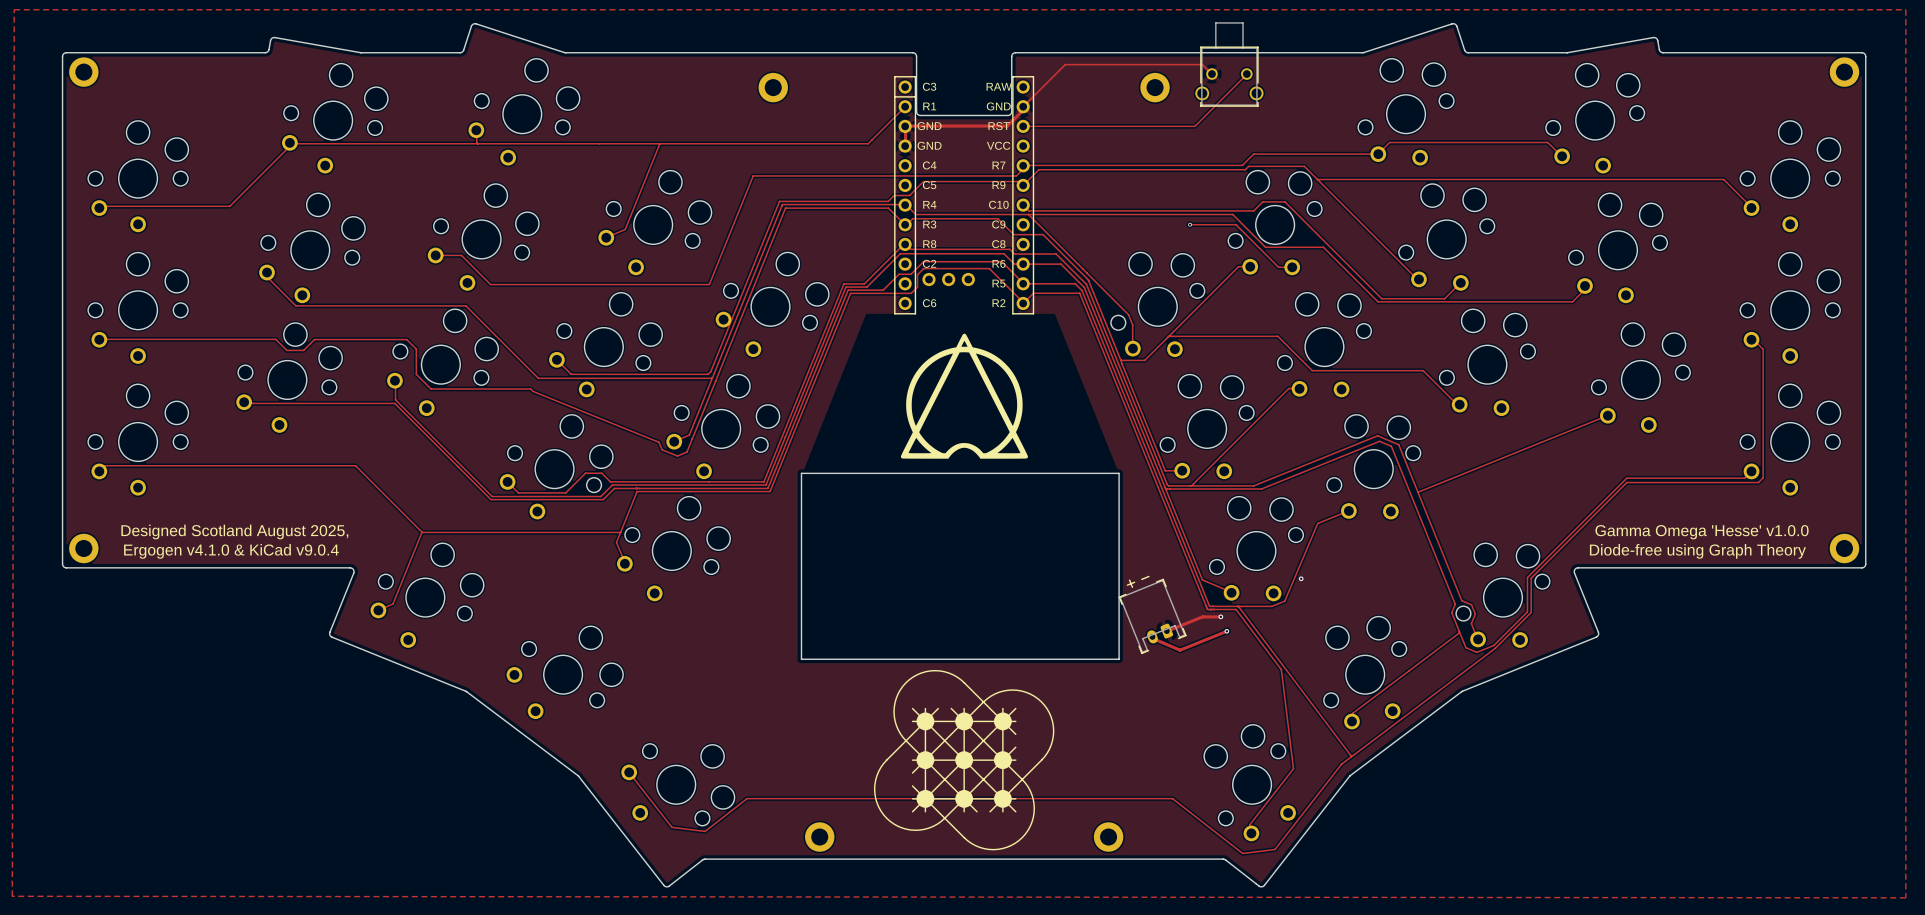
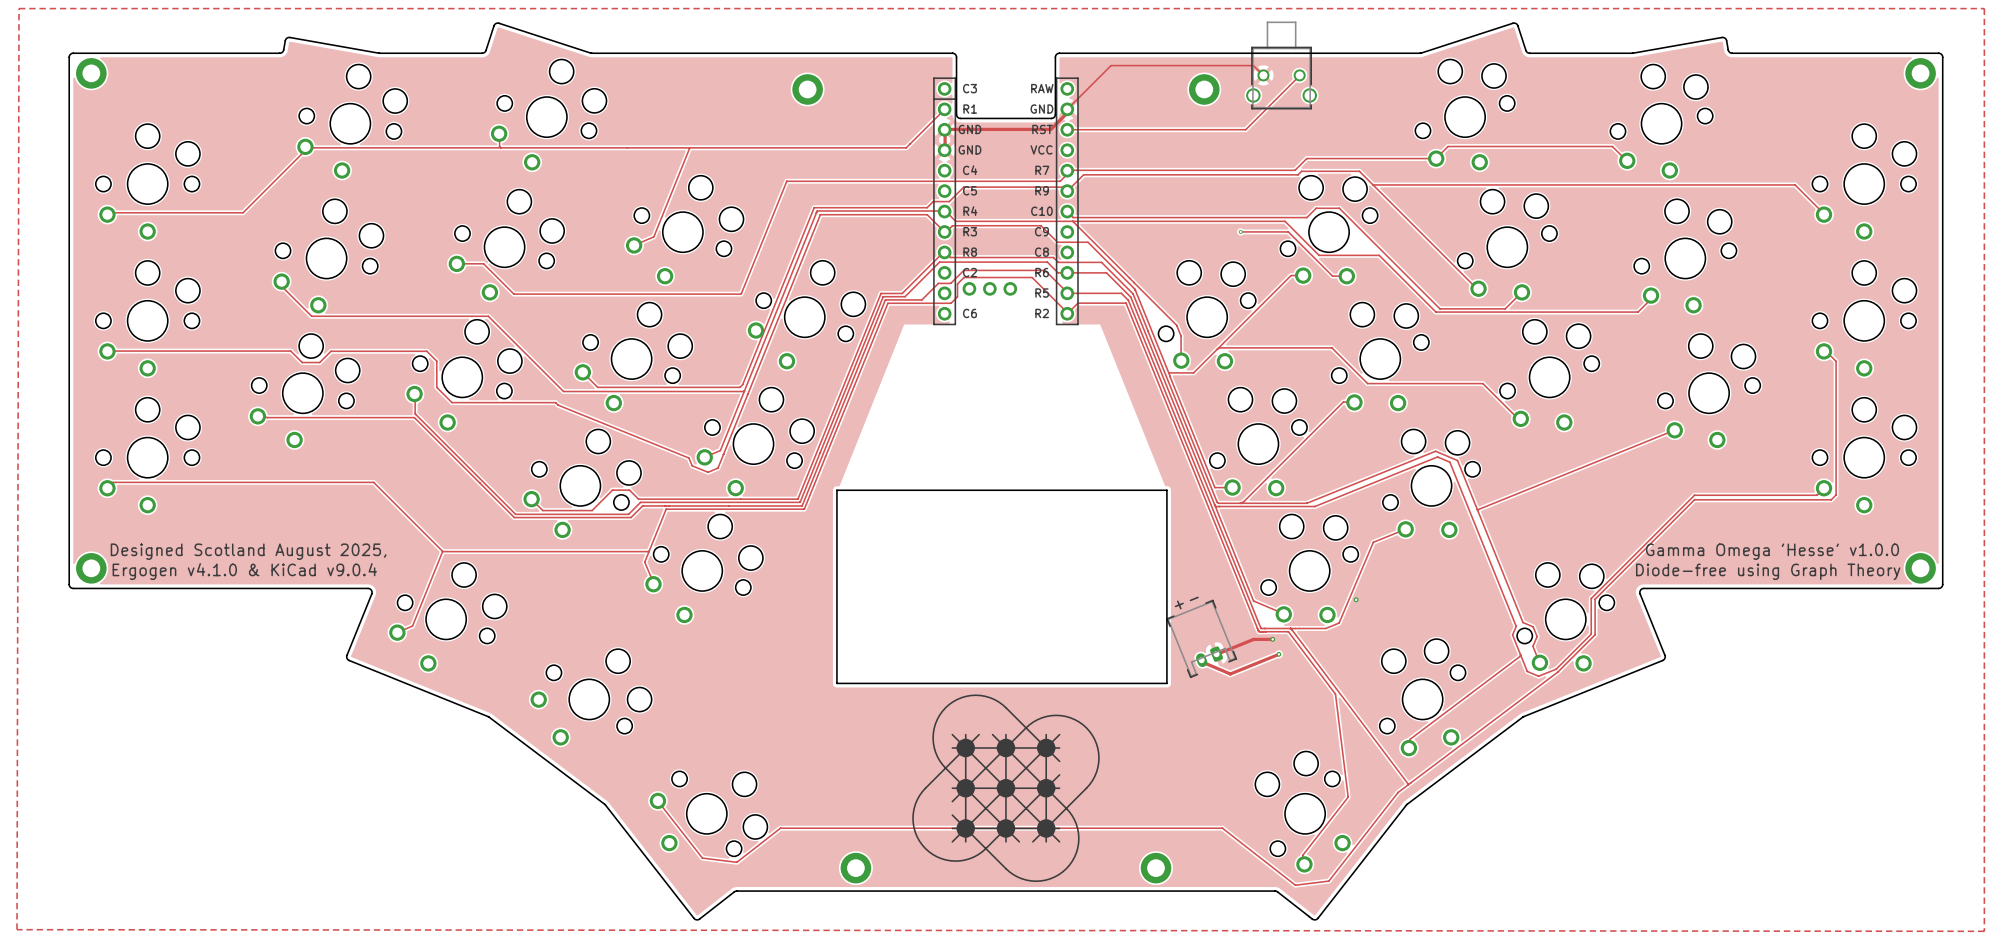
drawing: [900, 333, 1029, 459] -> none

